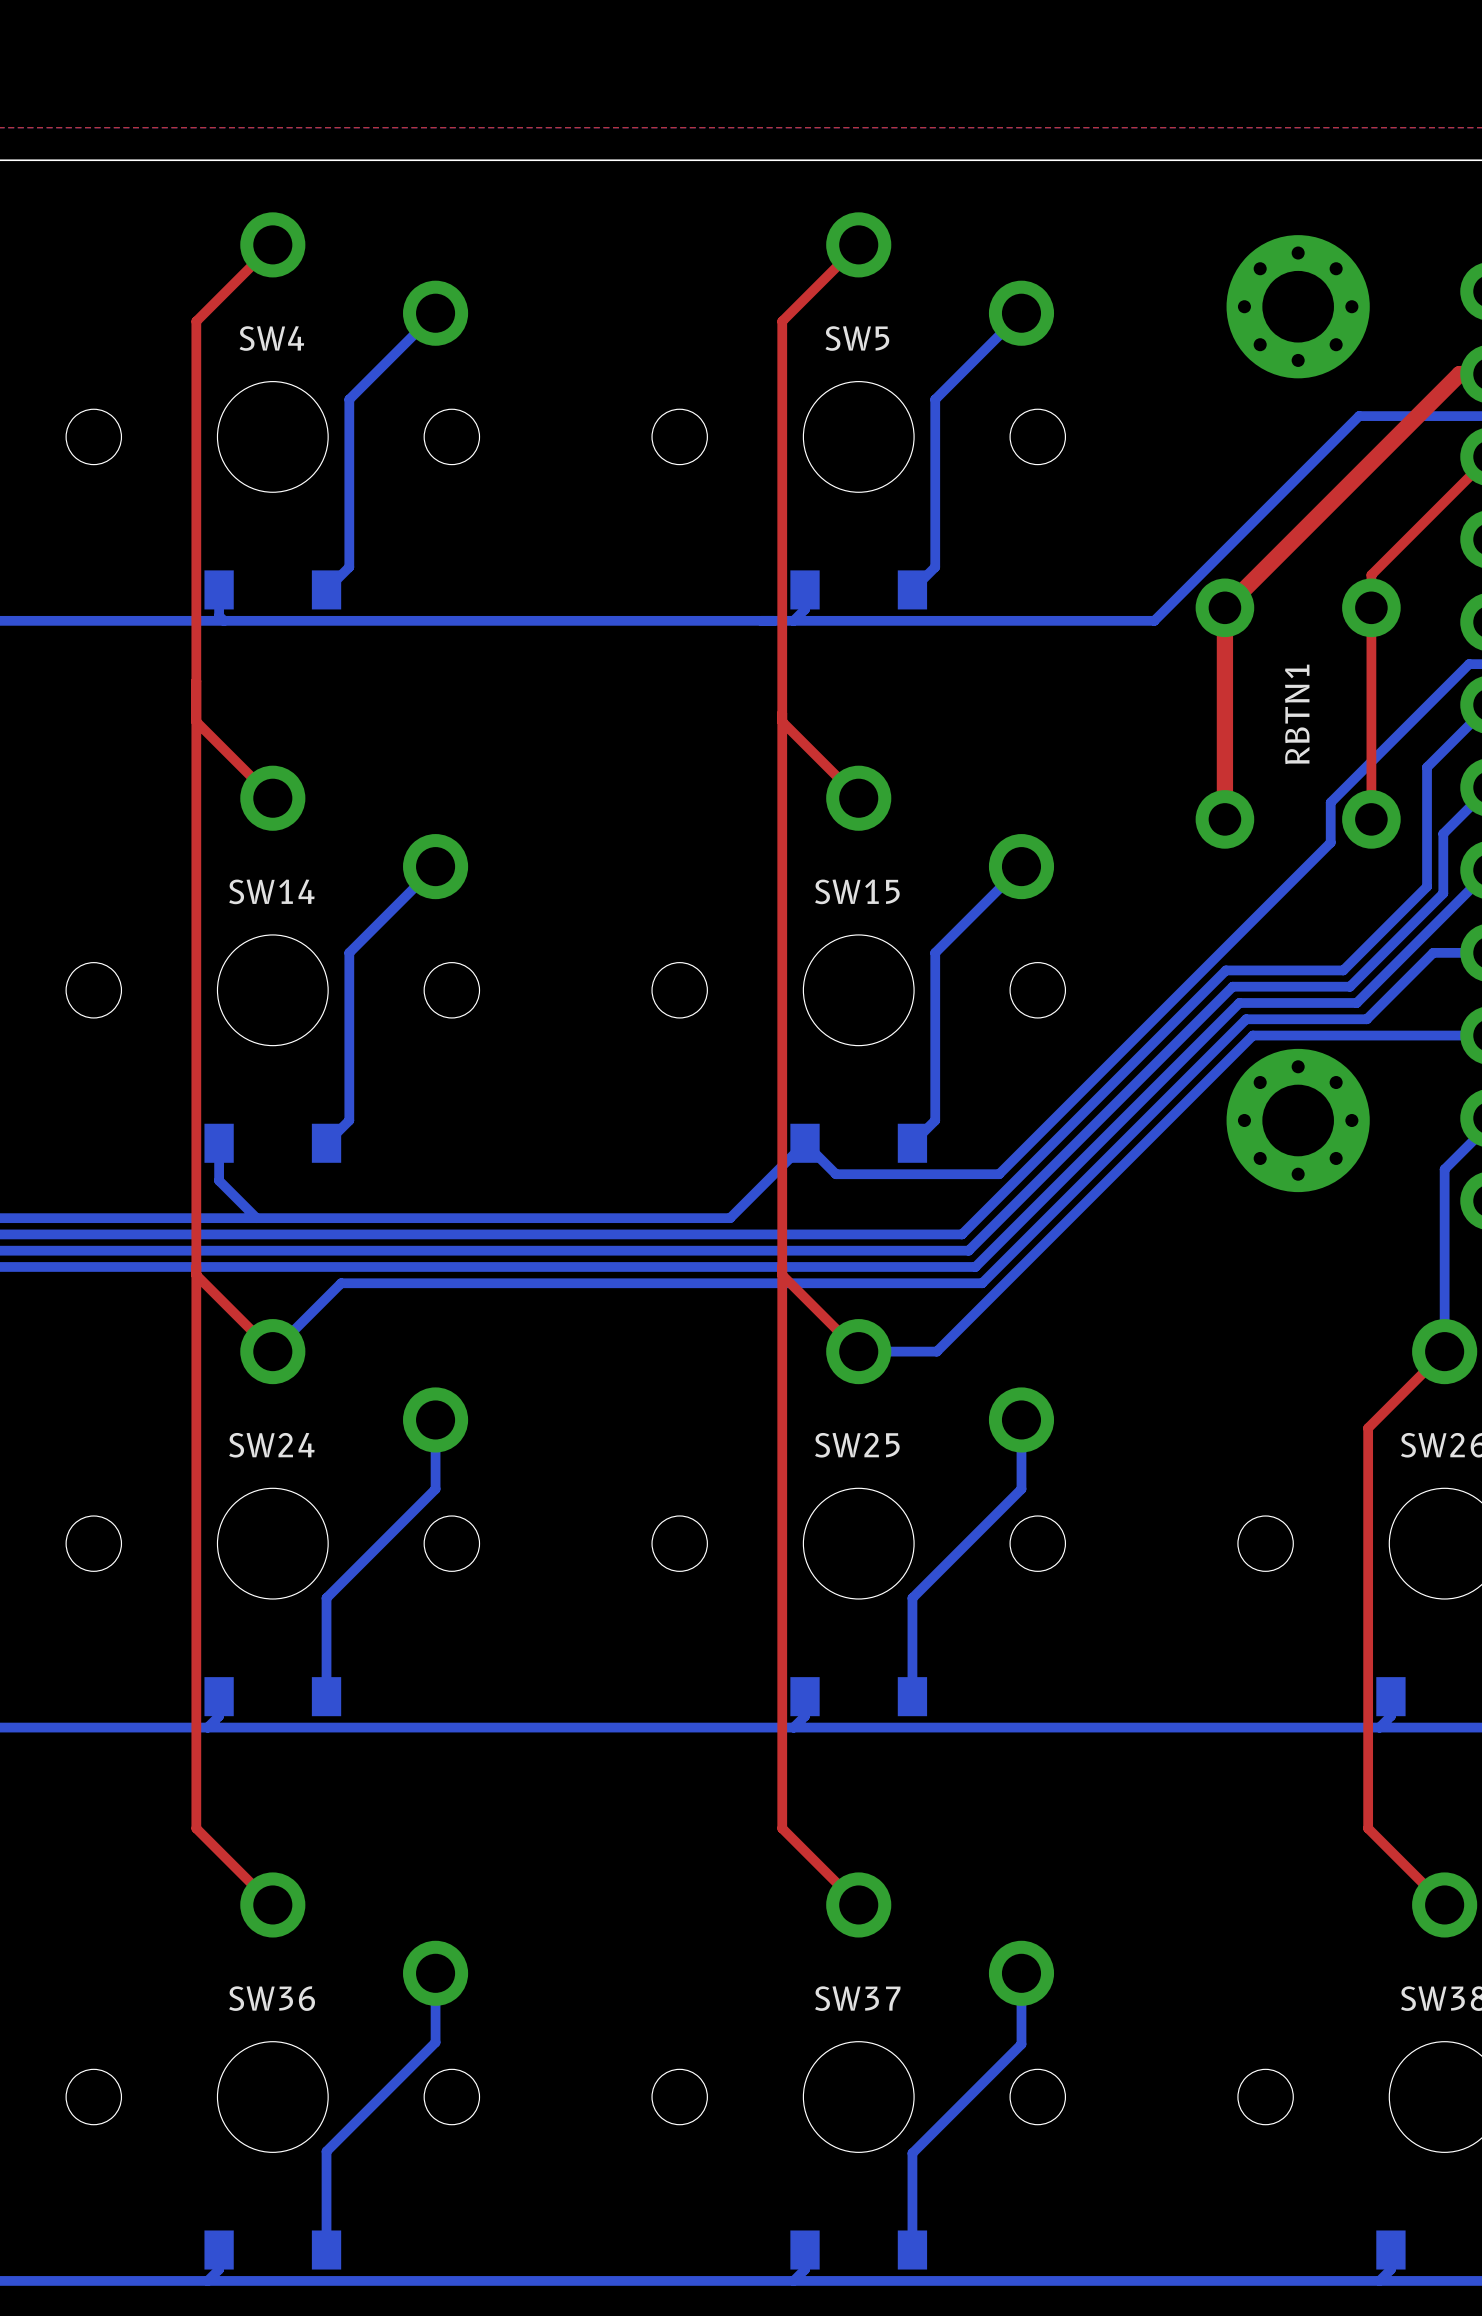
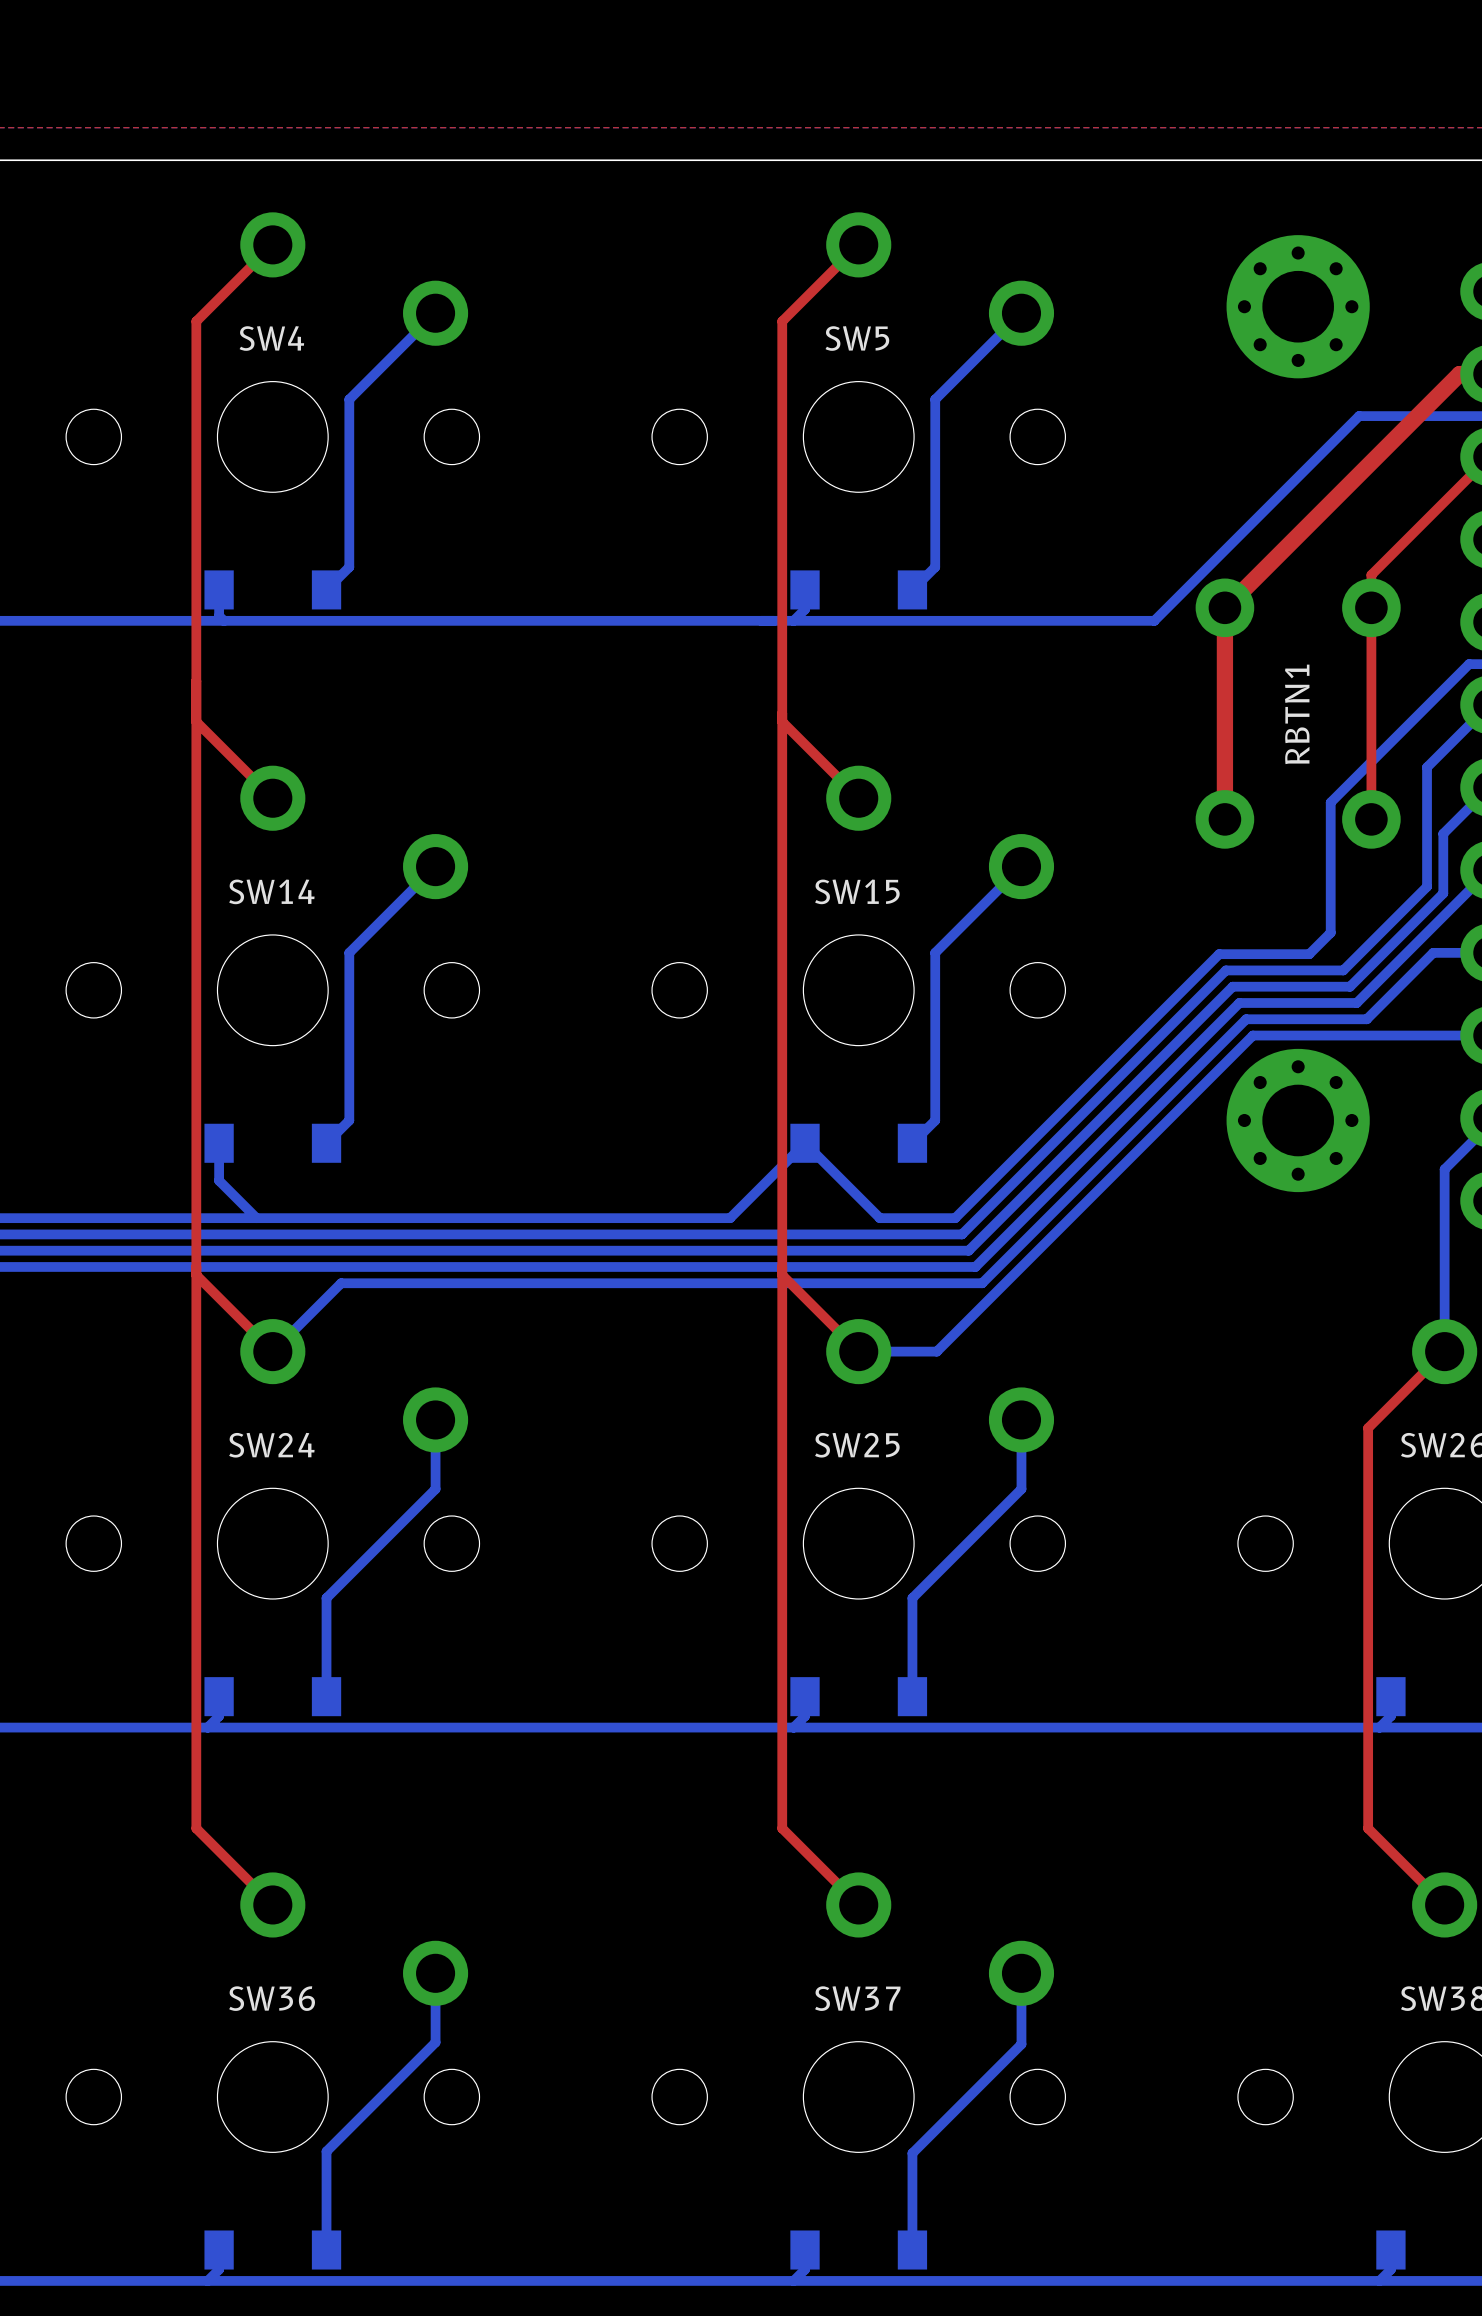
bottom track: (1330, 842) (1219, 954) -> (1330, 842) (1330, 932) (1309, 954) (1219, 954)
bottom track: (835, 1174) (999, 1174) -> (835, 1174) (879, 1218) (955, 1218) (999, 1174)

